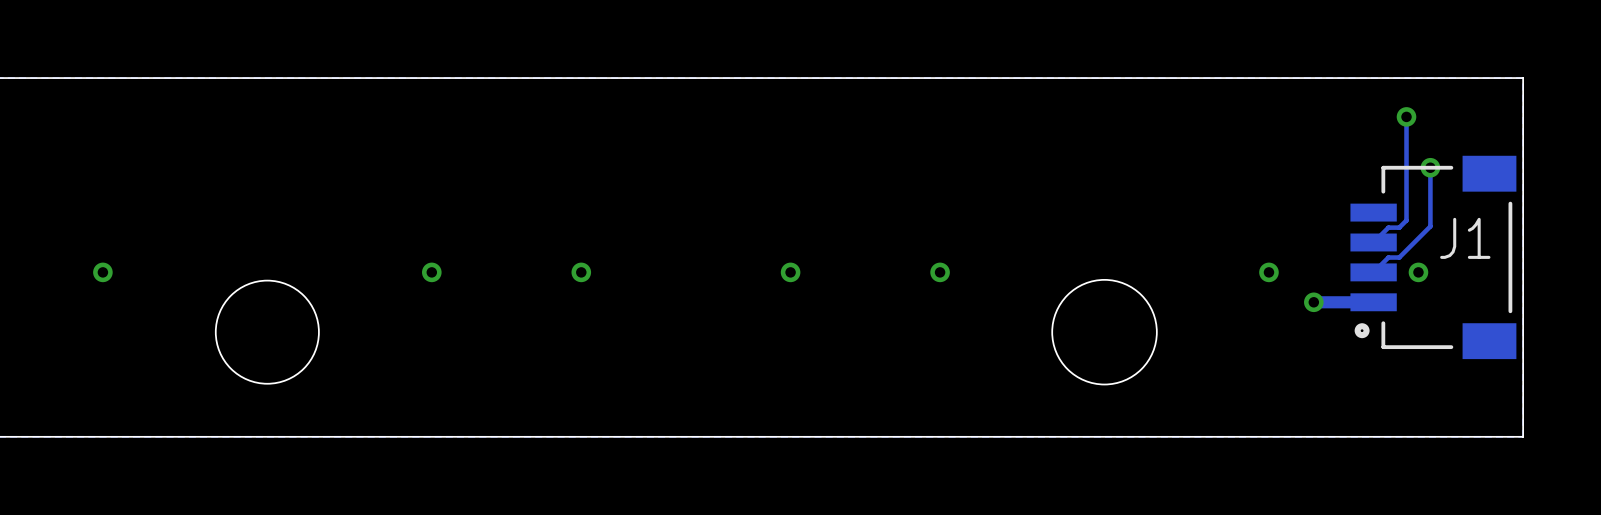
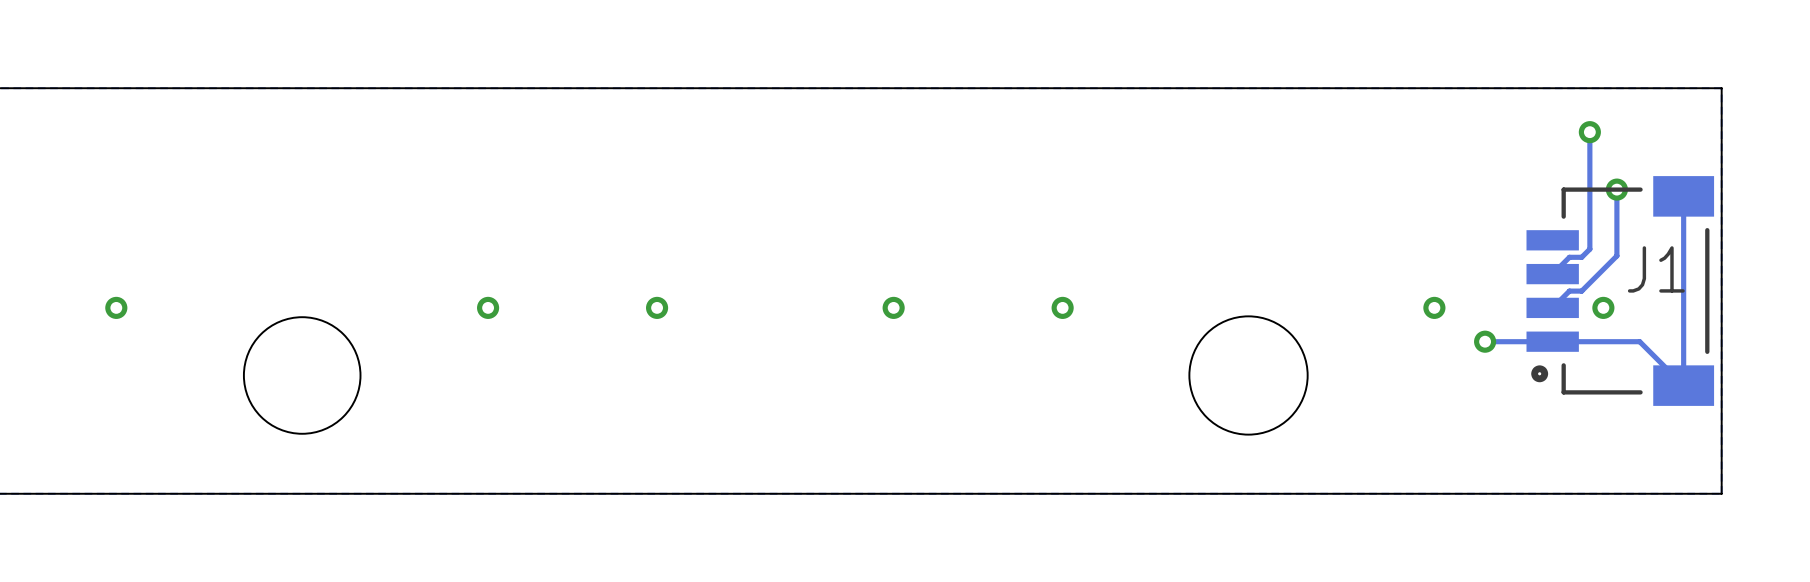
track: none -> (1683, 196) (1683, 385) (1639, 341) (1552, 341)
track width: thick (1373, 302) (1313, 302) -> thin (1552, 341) (1485, 341)

